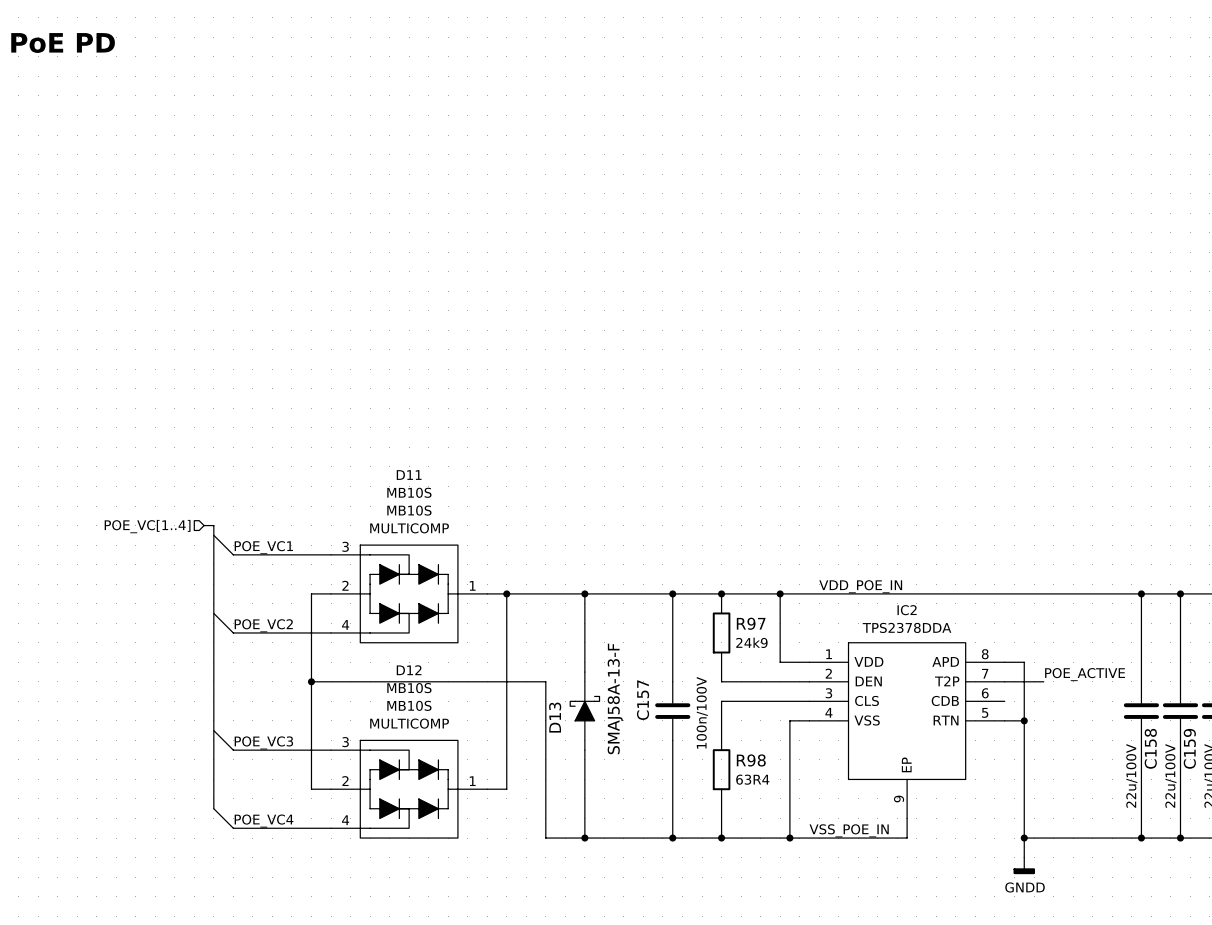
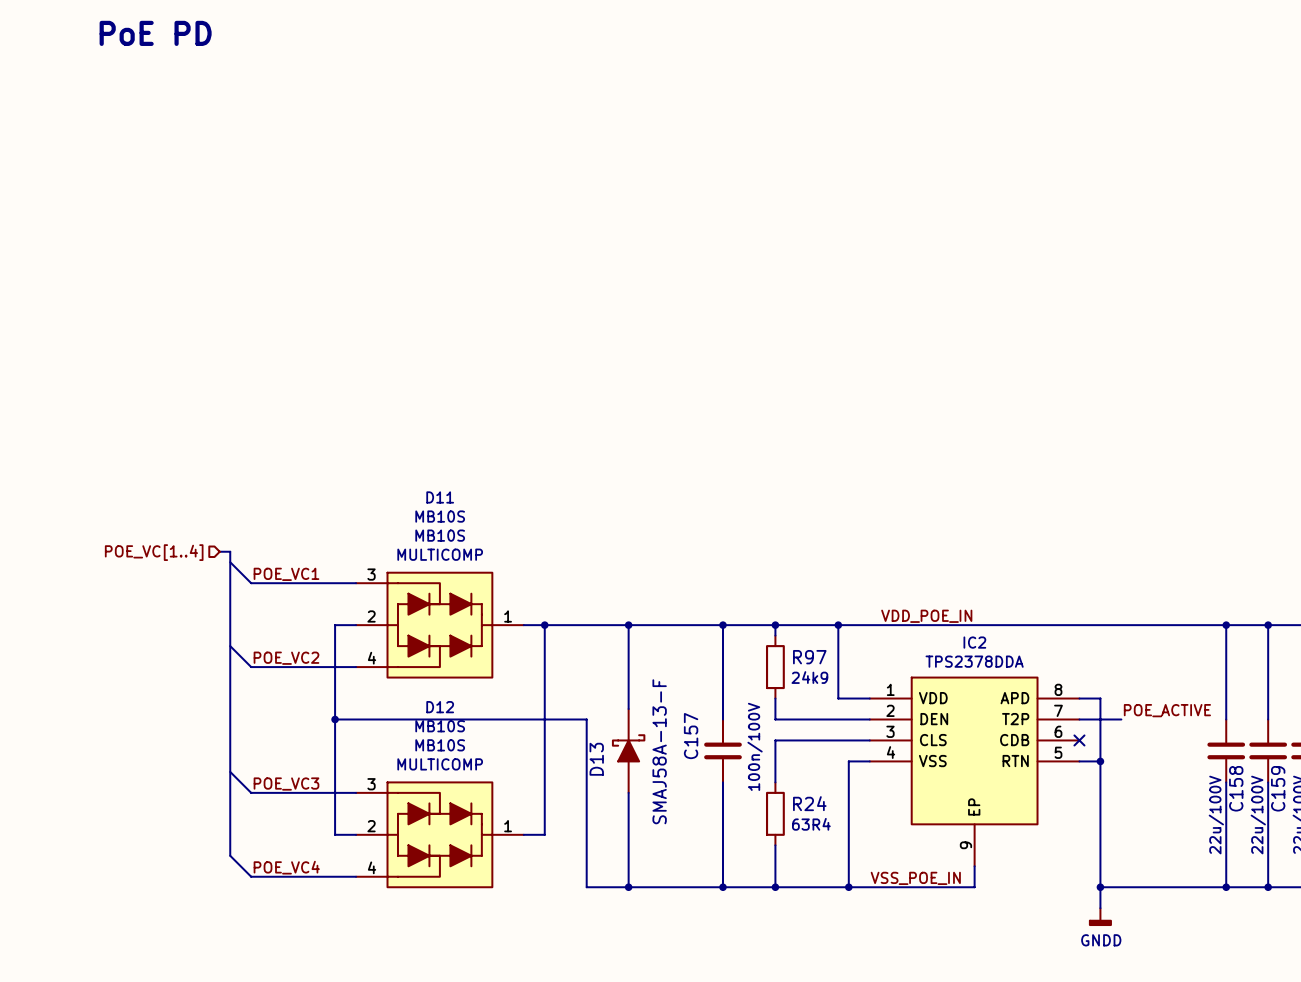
text position: PoE PD (63, 43) -> PoE PD (155, 33)
no-connect mark: none -> (1079, 740)
R98 name: R98 (751, 760) -> R24 (809, 803)

